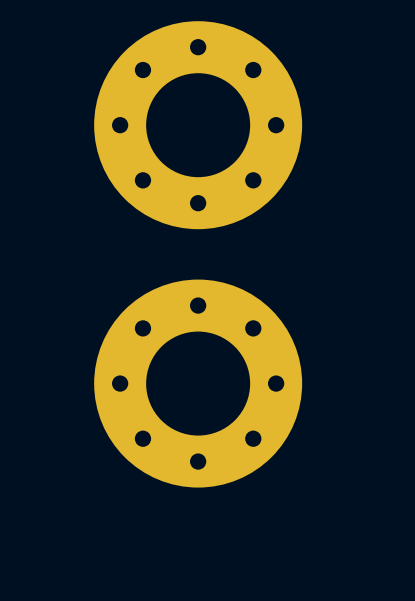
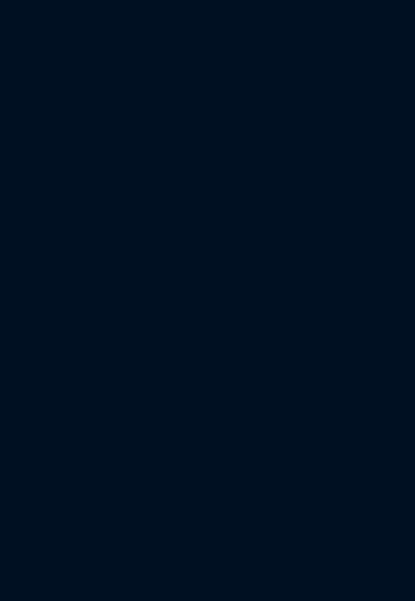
part: (198, 125) -> none
part: (198, 383) -> none

